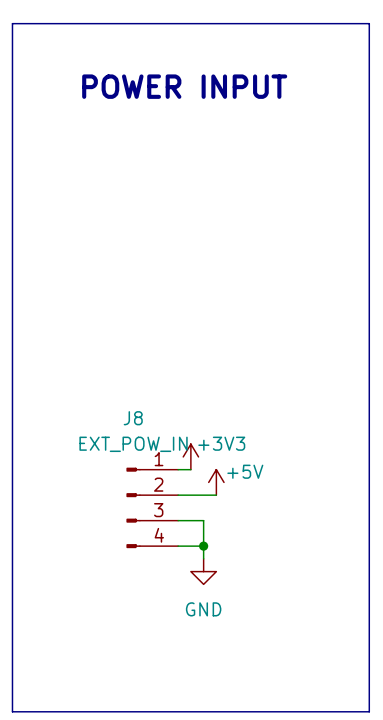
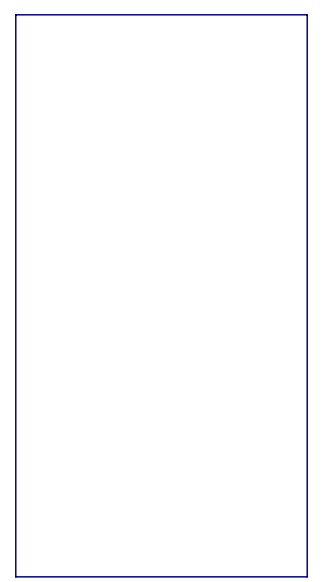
text: POWER INPUT (184, 86) -> none
power symbol: +3V3 (190, 456) -> none
wire: (178, 469) (190, 469) -> none
power symbol: +5V (216, 482) -> none
wire: (178, 495) (216, 495) -> none
J8: EXT_POW_IN (152, 507) -> none
wire: (178, 520) (203, 520) (203, 558) -> none
wire: (178, 546) (203, 546) -> none
junction: (203, 546) -> none
power symbol: GND (203, 571) -> none

